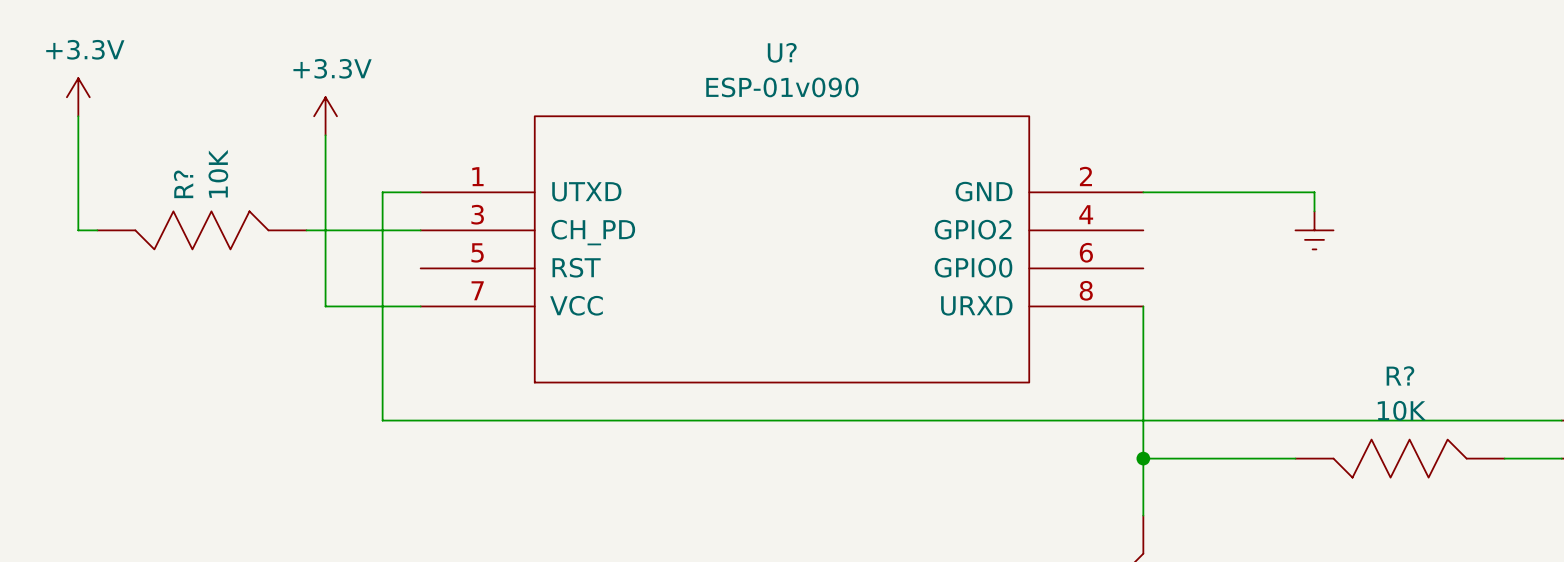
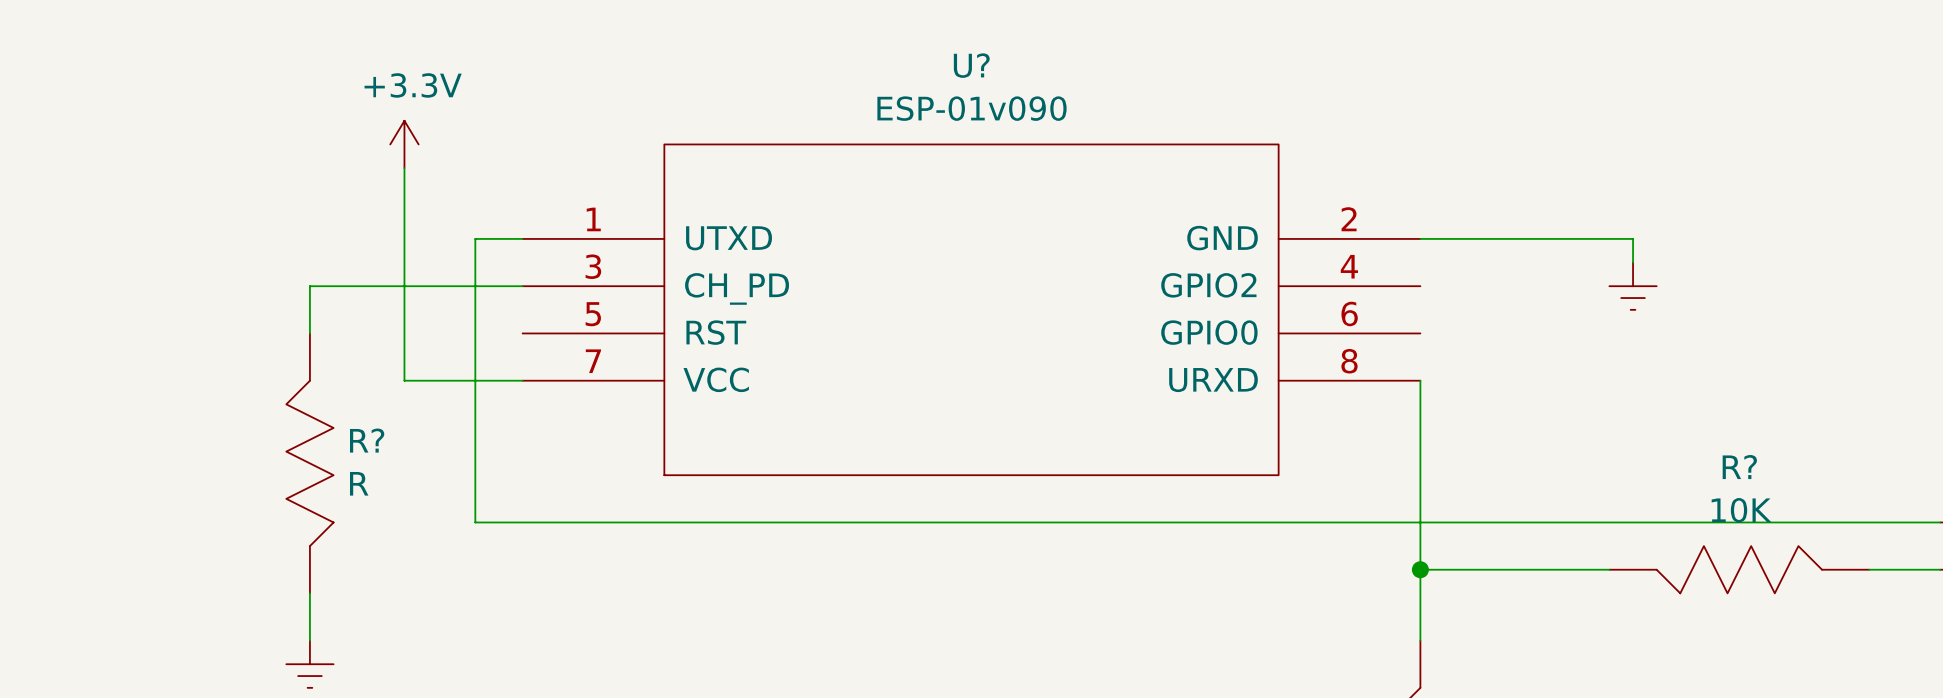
power symbol: +3.3V (78, 97) -> none
wire: (78, 116) (78, 230) (97, 230) -> none
R?: 10K (201, 230) -> none
wire: none -> (380, 286) (309, 286) (309, 333)
R?: none -> R (309, 463)
wire: none -> (309, 593) (309, 640)
power symbol: none -> (309, 664)

